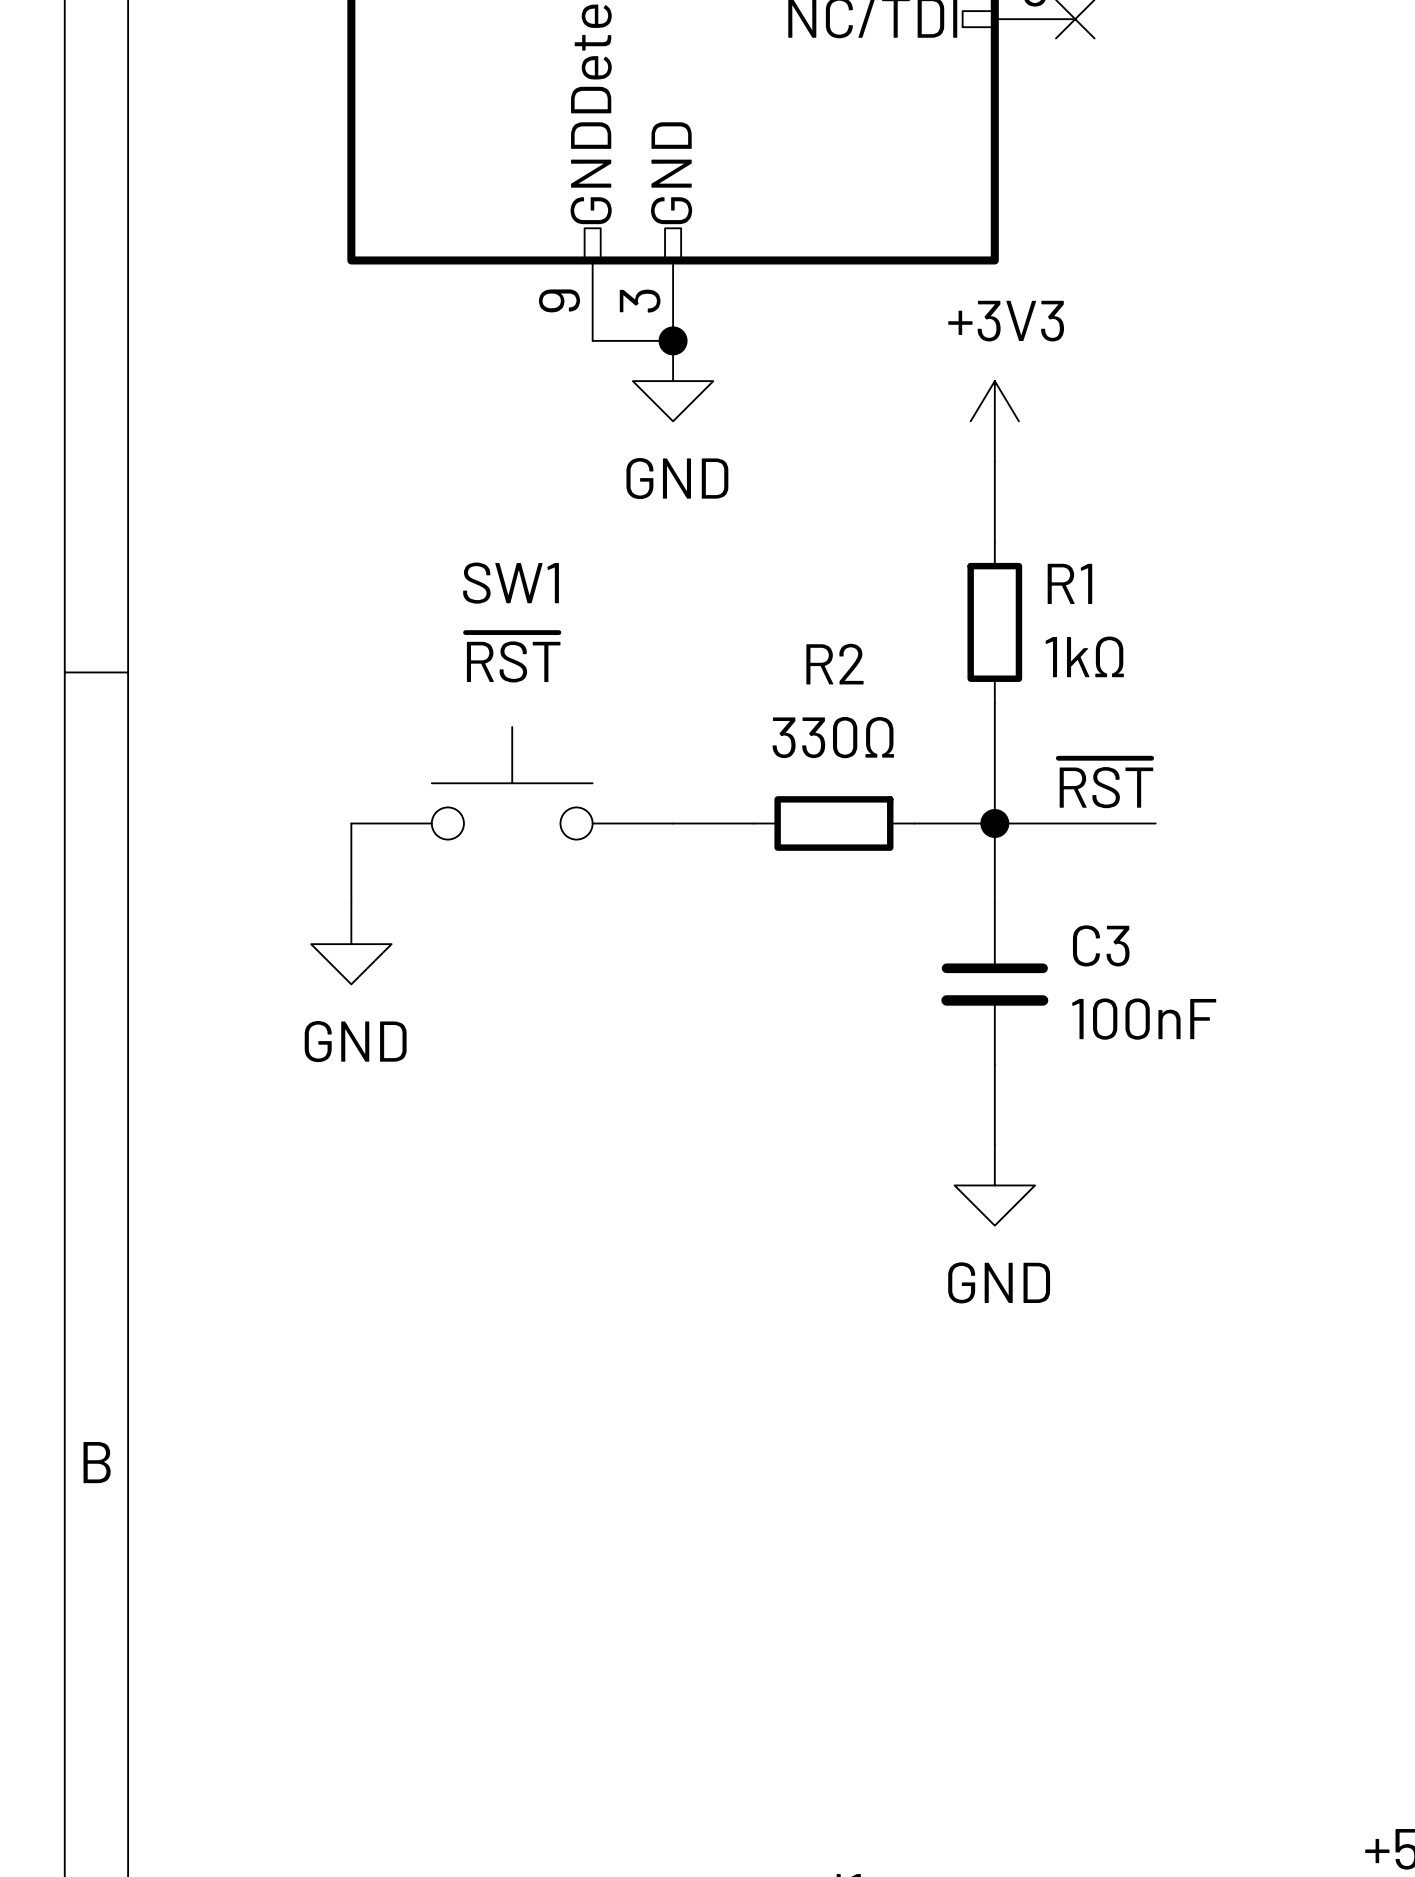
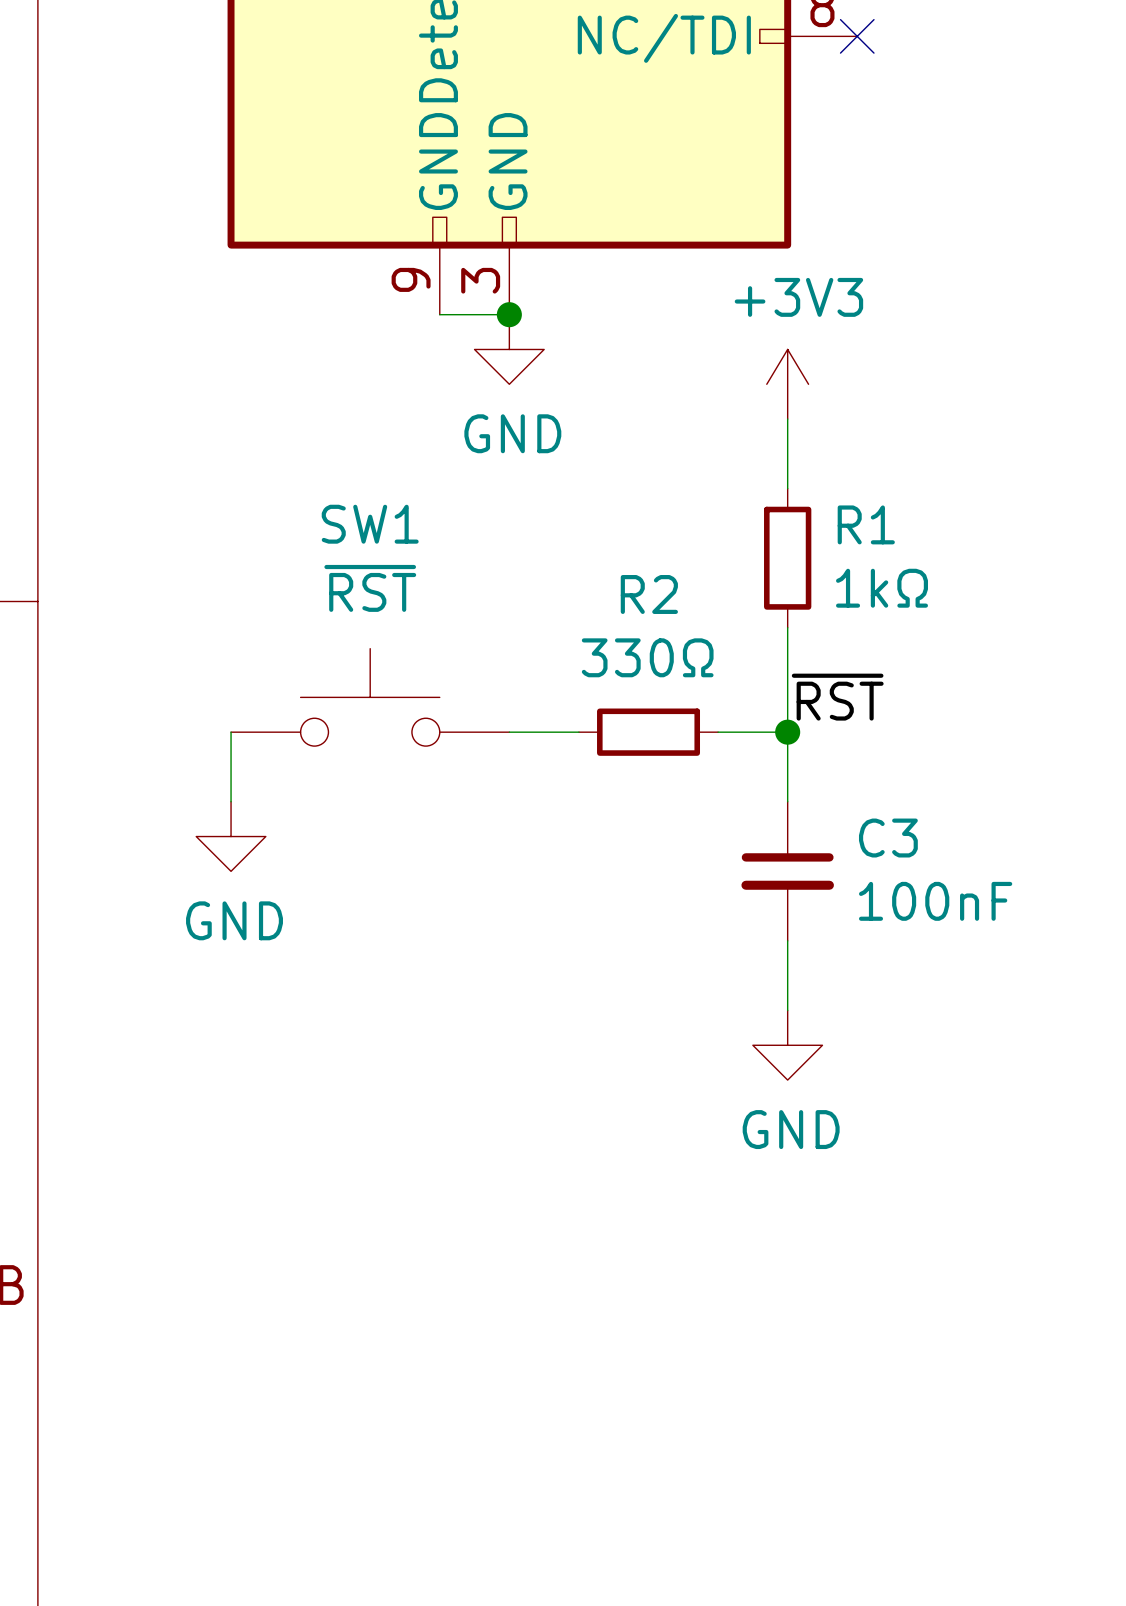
label position: ~{RST} (1105, 783) -> ~{RST} (837, 697)
wire: (994, 823) (1155, 823) -> none

